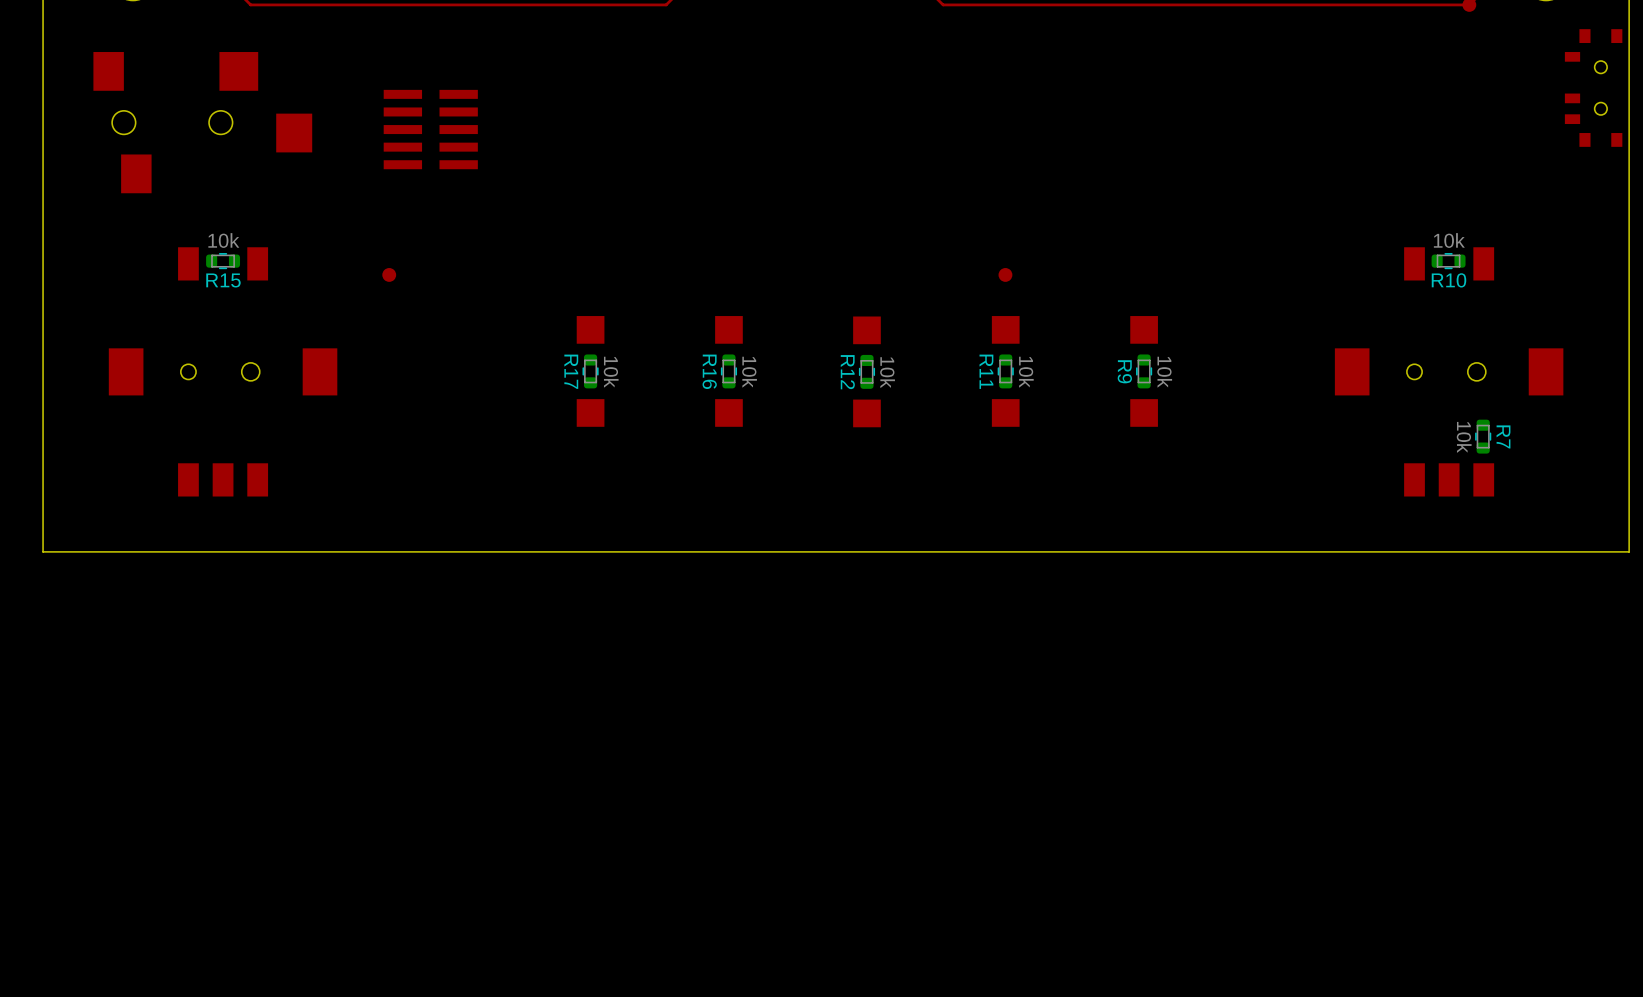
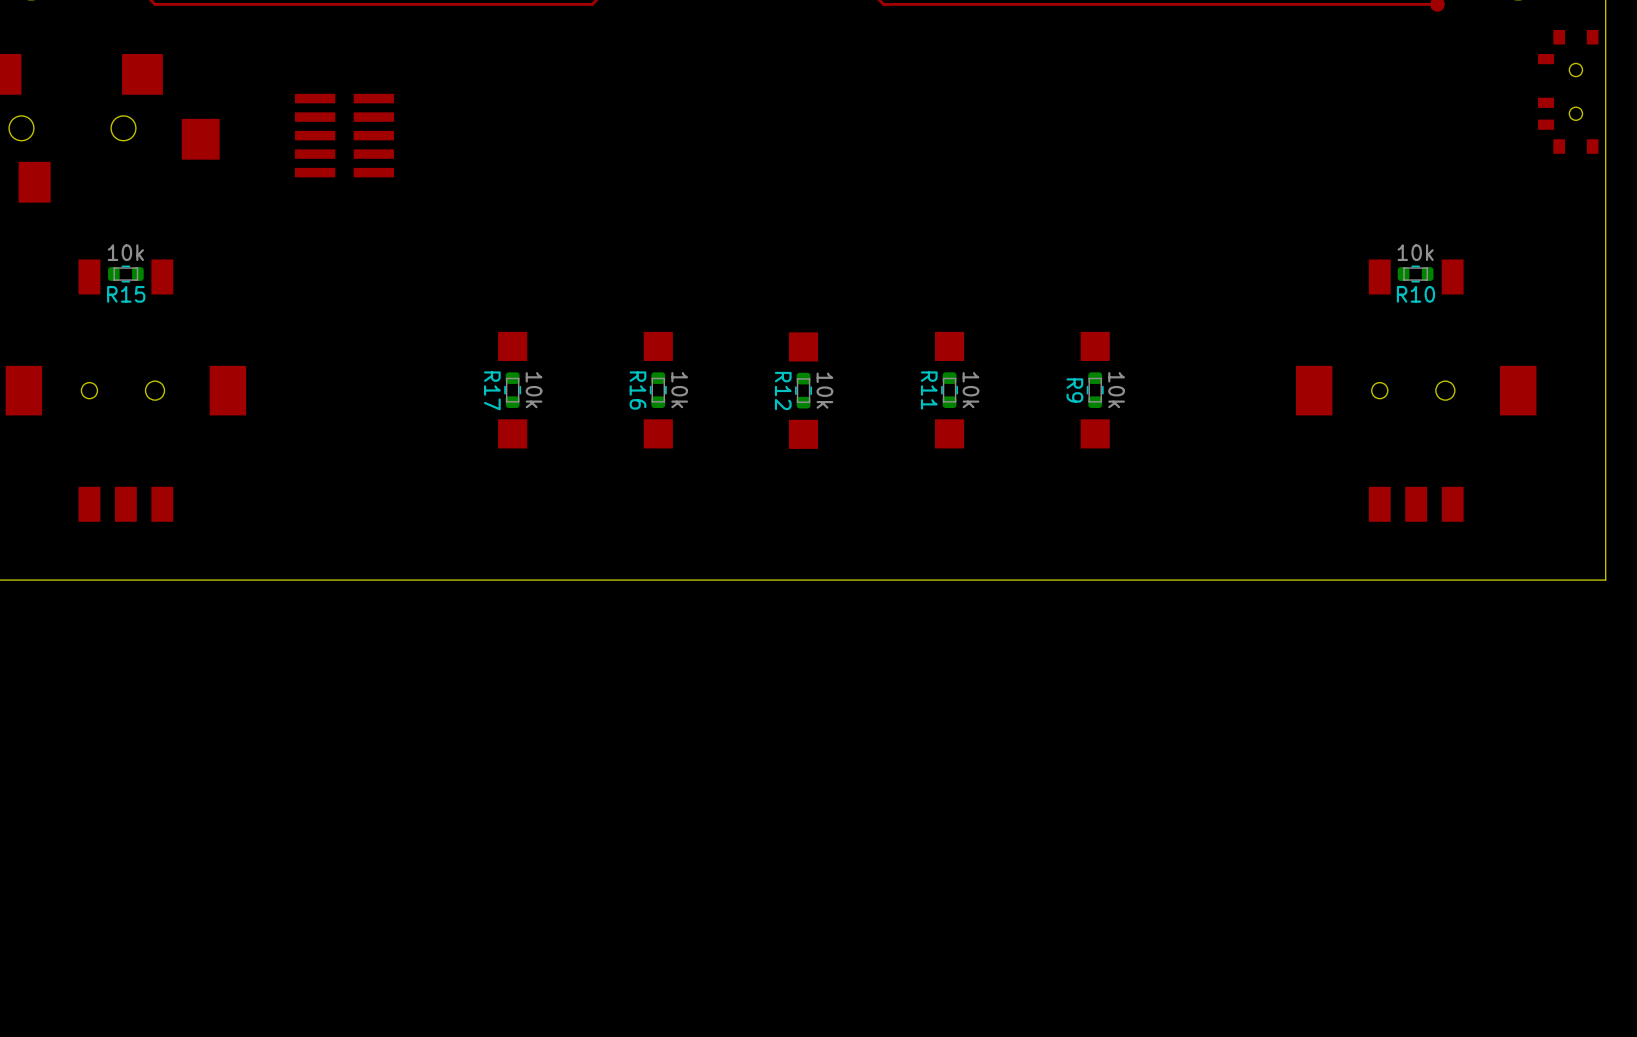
part: (389, 274) -> none
part: (1005, 274) -> none
R7: 10k (1483, 436) -> none

